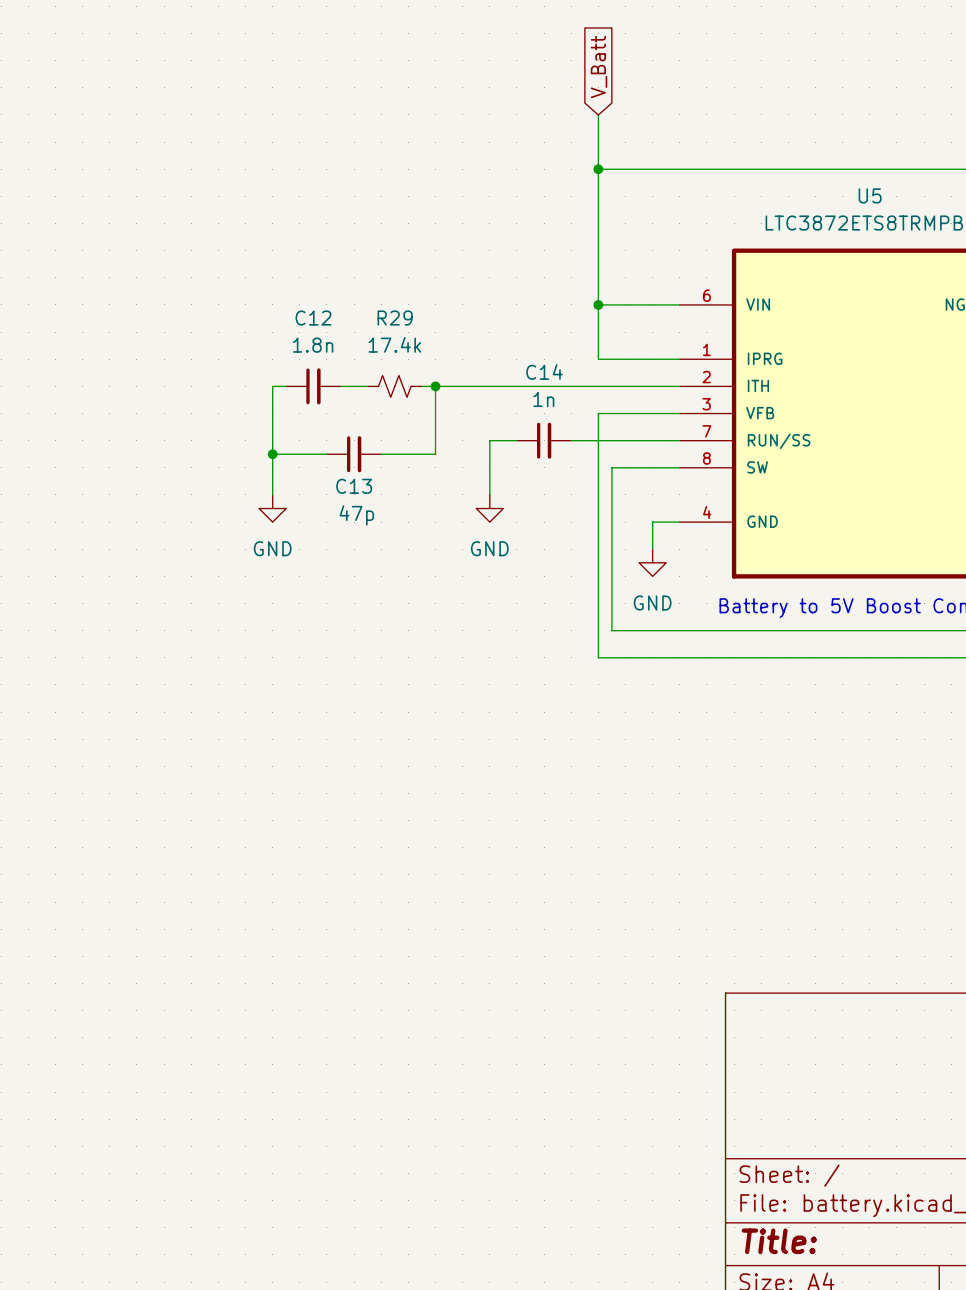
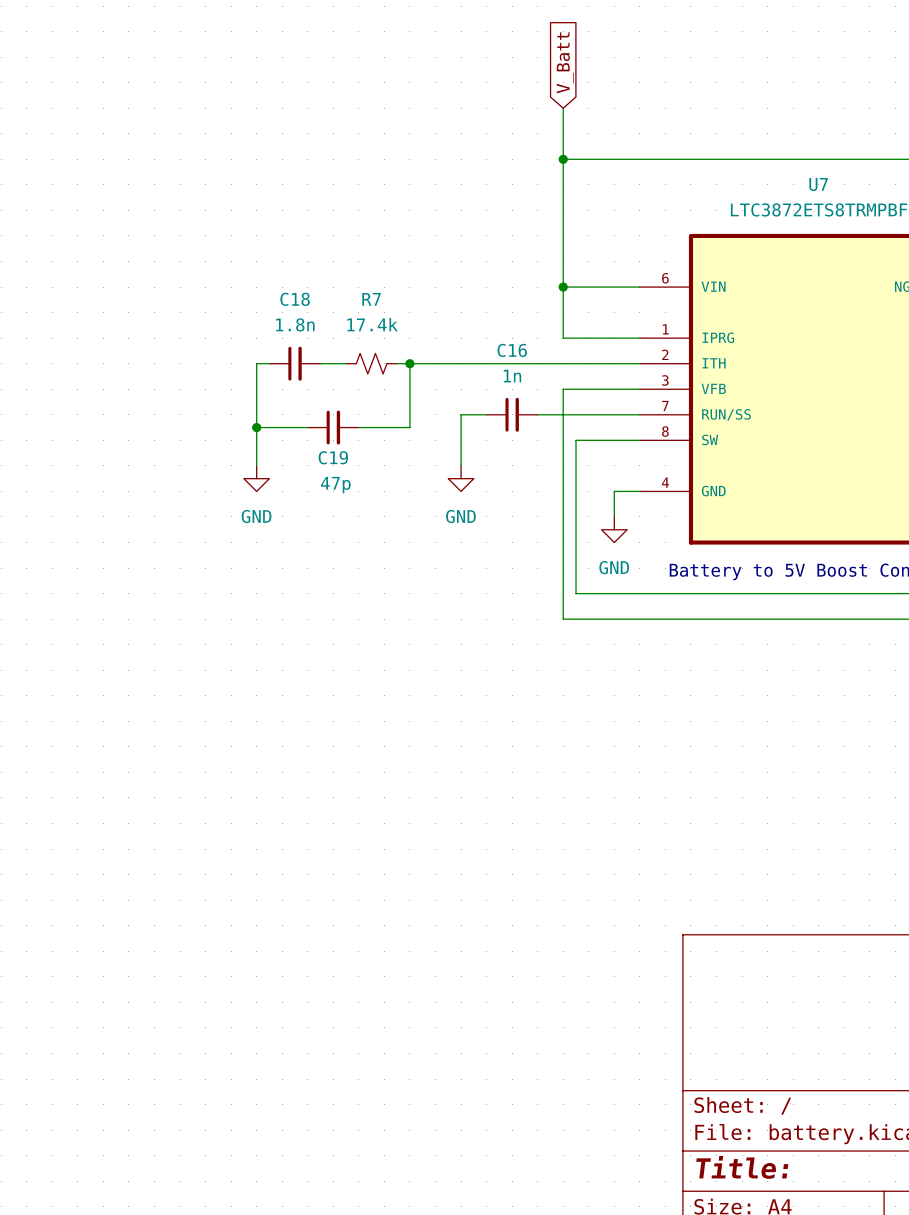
U5 name: U5 (870, 195) -> U7 (818, 184)
C12 name: C12 (313, 318) -> C18 (295, 299)
R29 name: R29 (395, 318) -> R7 (371, 299)
C14 name: C14 (544, 371) -> C16 (512, 350)
C13 name: C13 (354, 486) -> C19 (333, 457)

